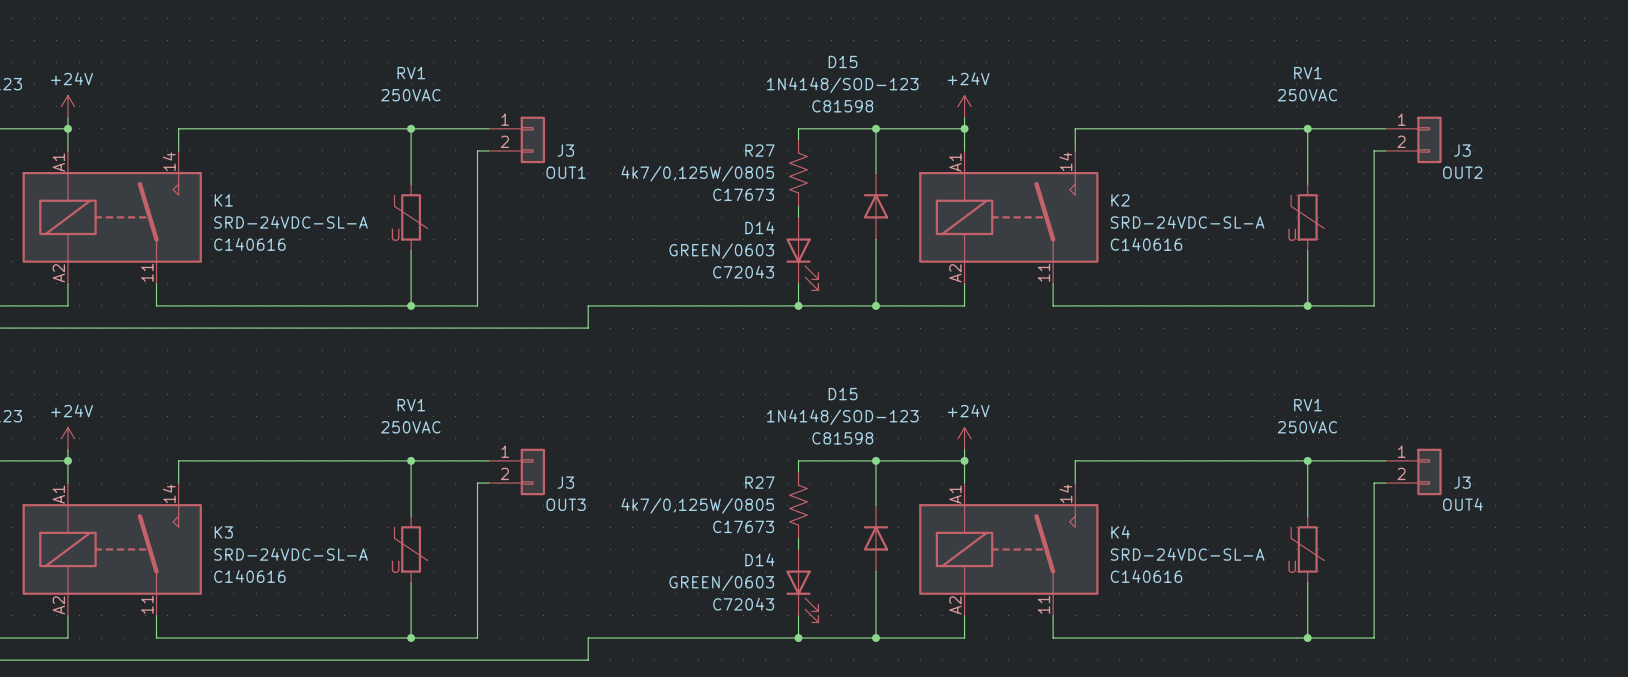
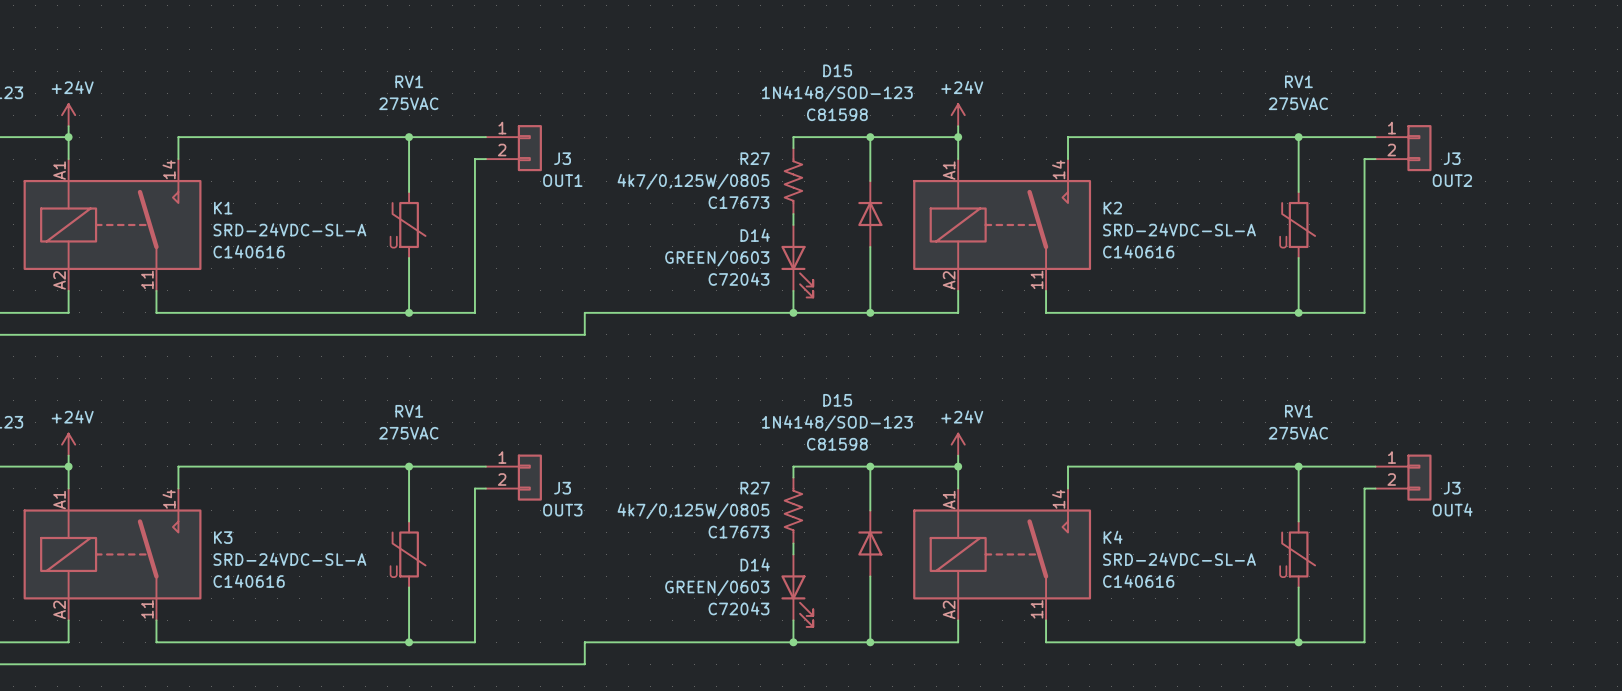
RV1 value: 250VAC (410, 95) -> 275VAC (408, 103)
RV1 value: 250VAC (1307, 95) -> 275VAC (1298, 103)
RV1 value: 250VAC (410, 427) -> 275VAC (408, 433)
RV1 value: 250VAC (1307, 427) -> 275VAC (1298, 433)

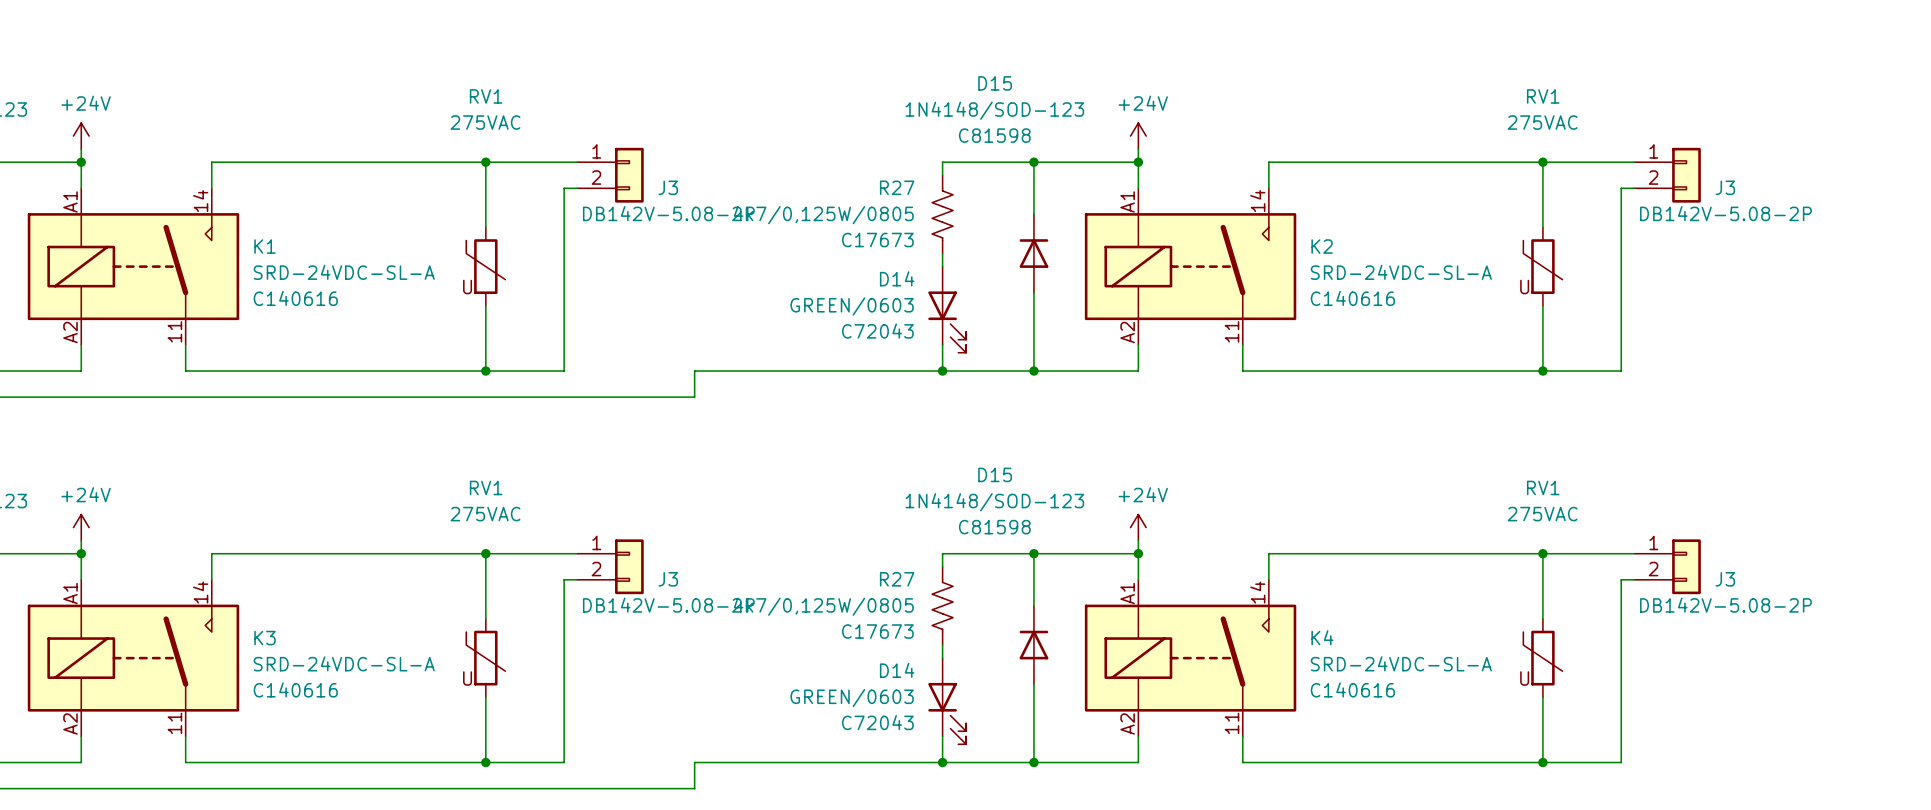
J3 value: OUT1 (562, 180) -> DB142V-5.08-2P (668, 213)
J3 value: OUT2 (1452, 180) -> DB142V-5.08-2P (1725, 213)
J3 value: OUT4 (1452, 509) -> DB142V-5.08-2P (1725, 605)
J3 value: OUT3 (562, 510) -> DB142V-5.08-2P (668, 605)

